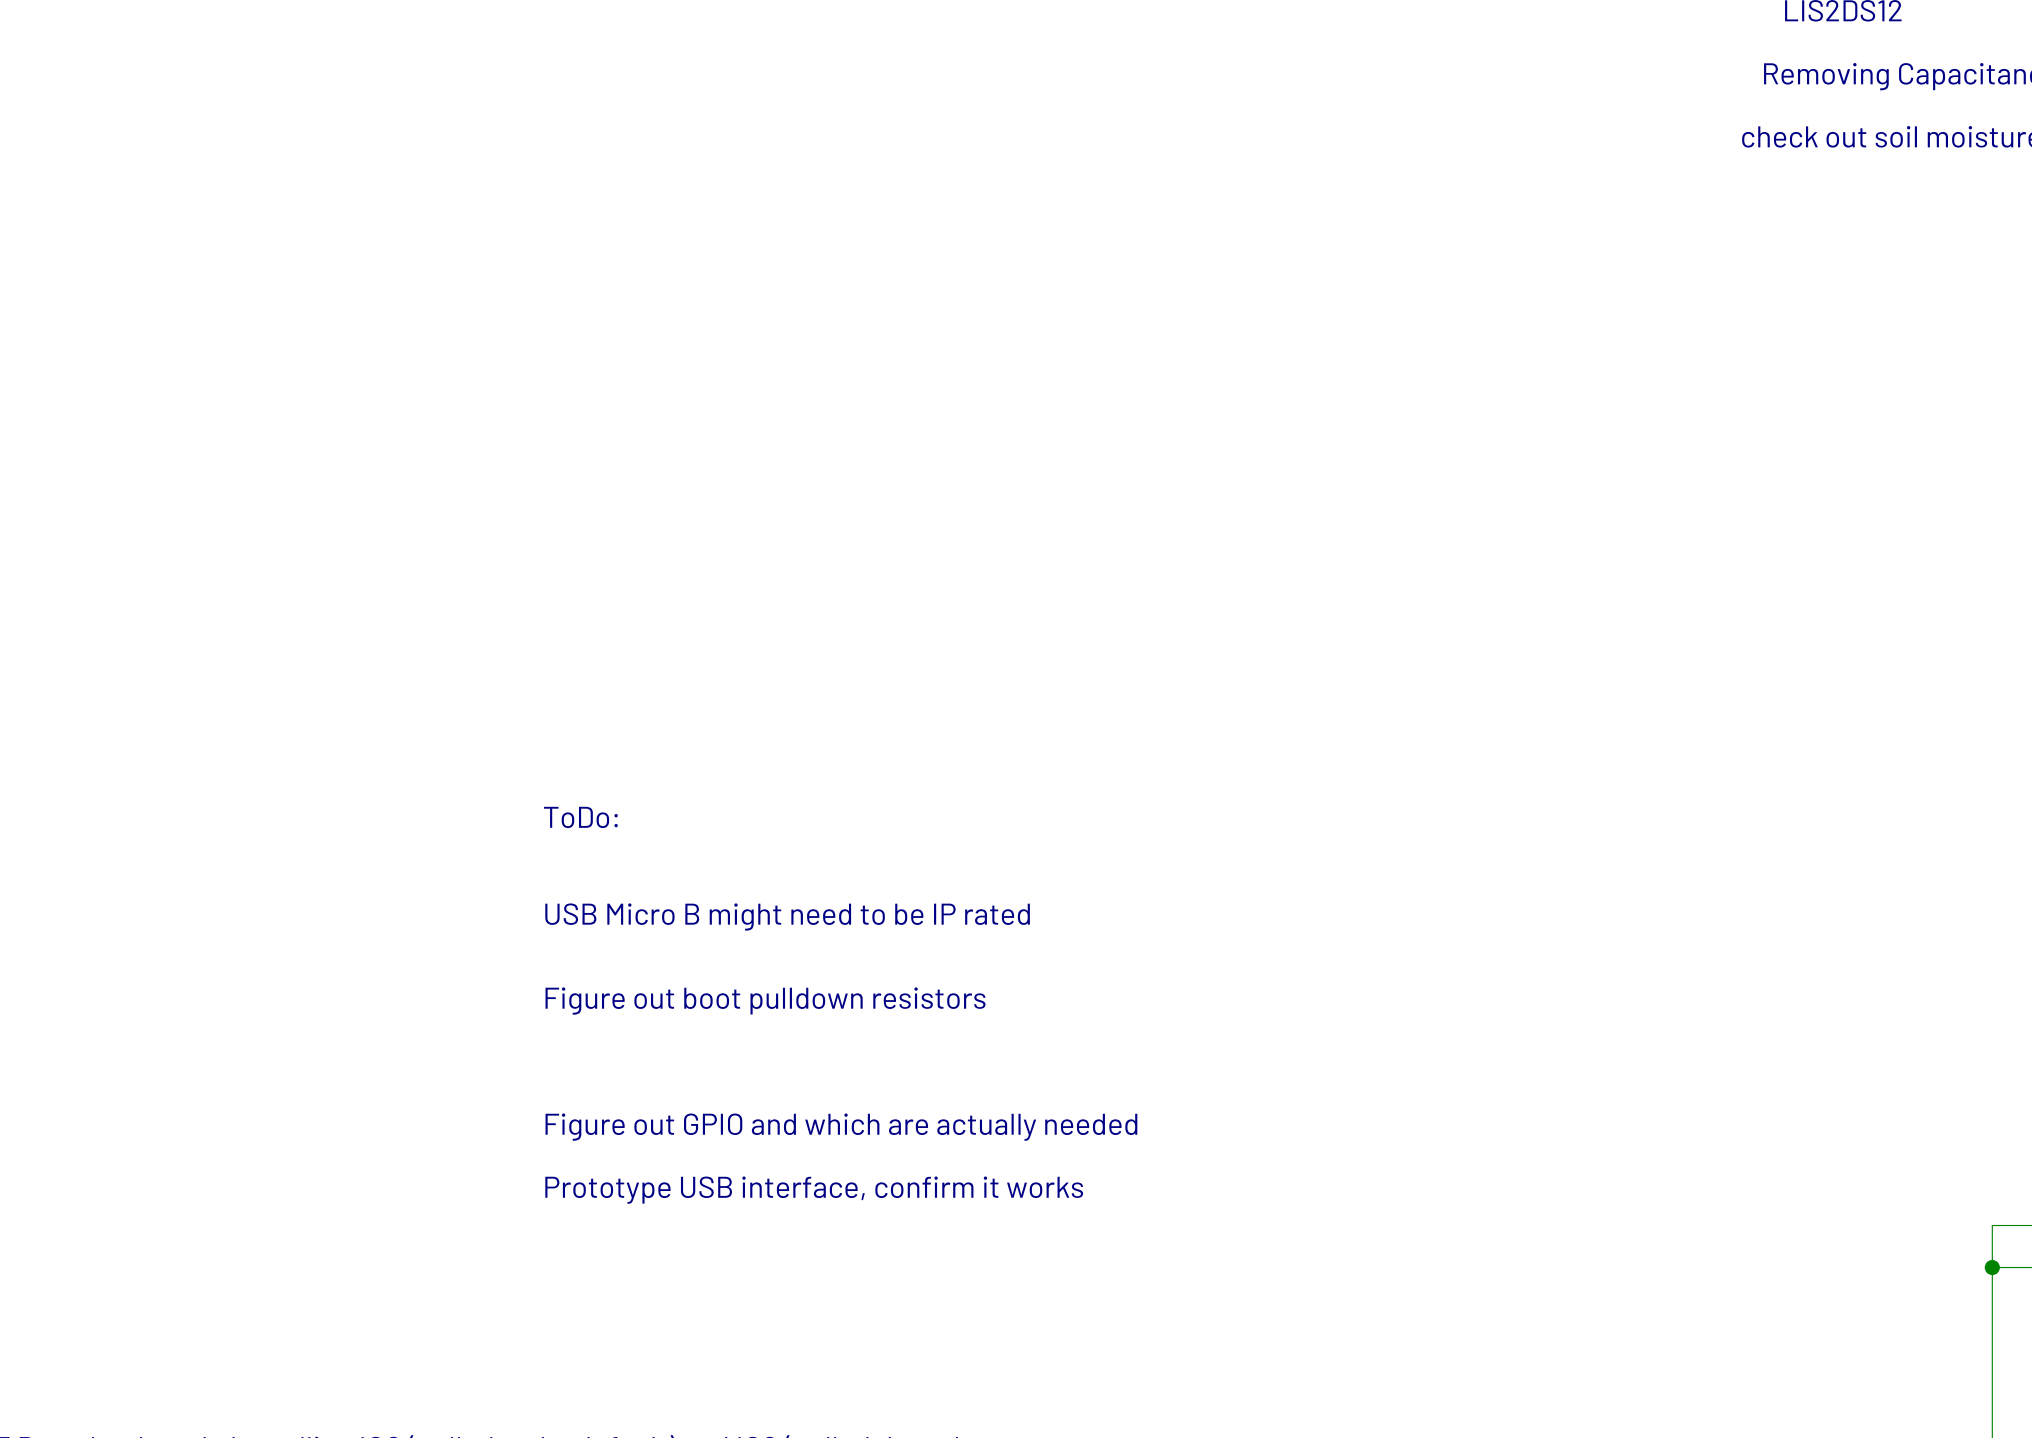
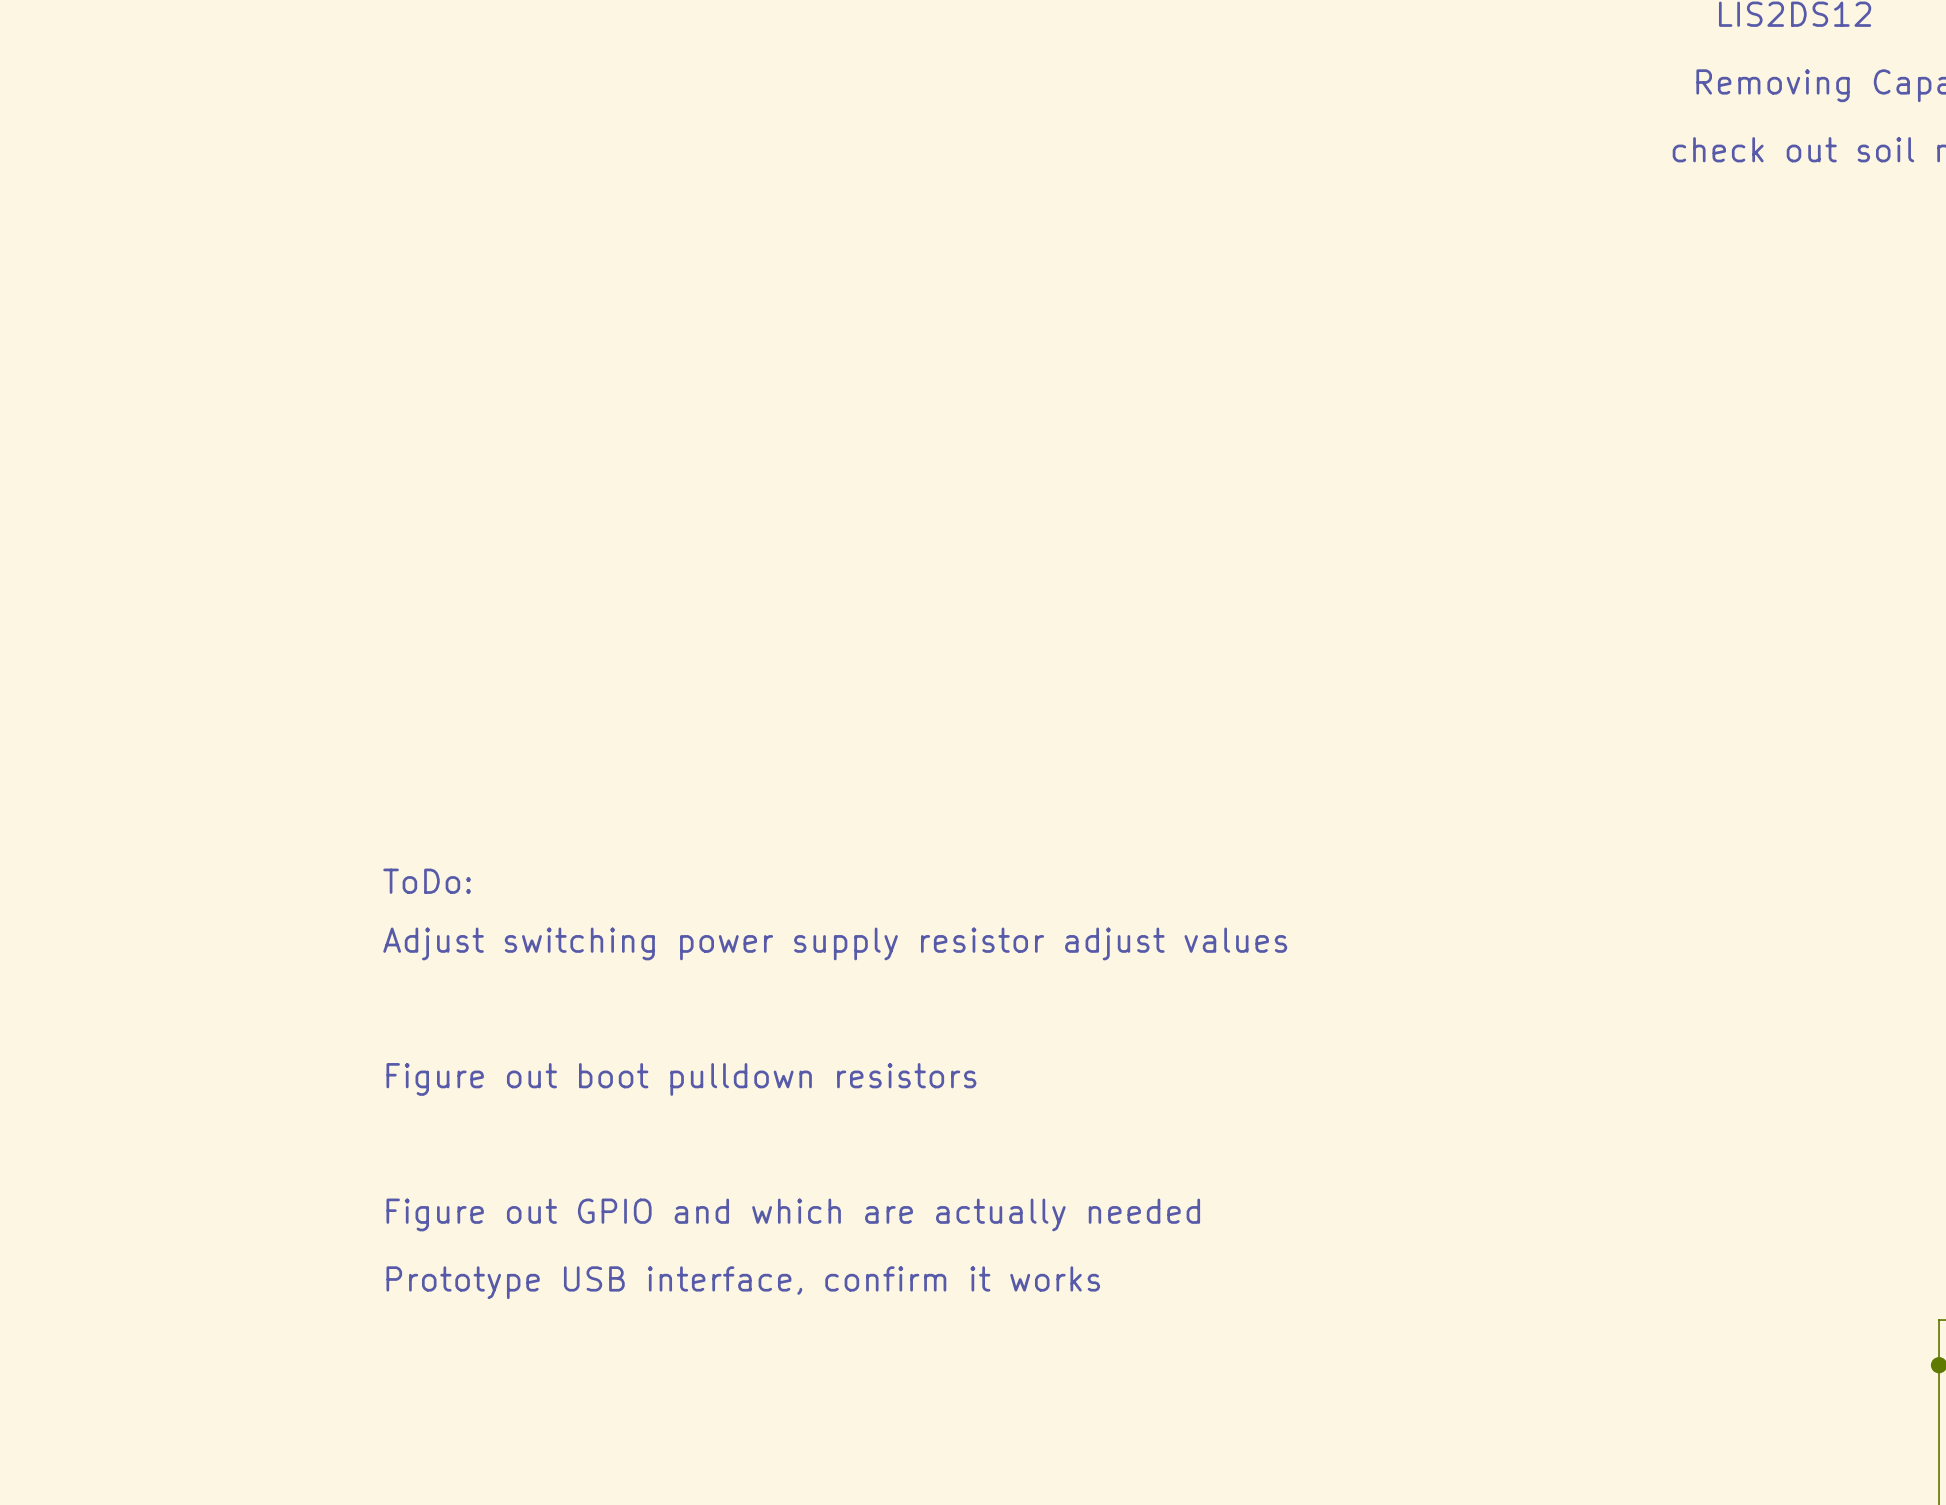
text: none -> Adjust switching power supply resistor adjust values (835, 943)
text: USB Micro B might need to be IP rated (787, 917) -> none

